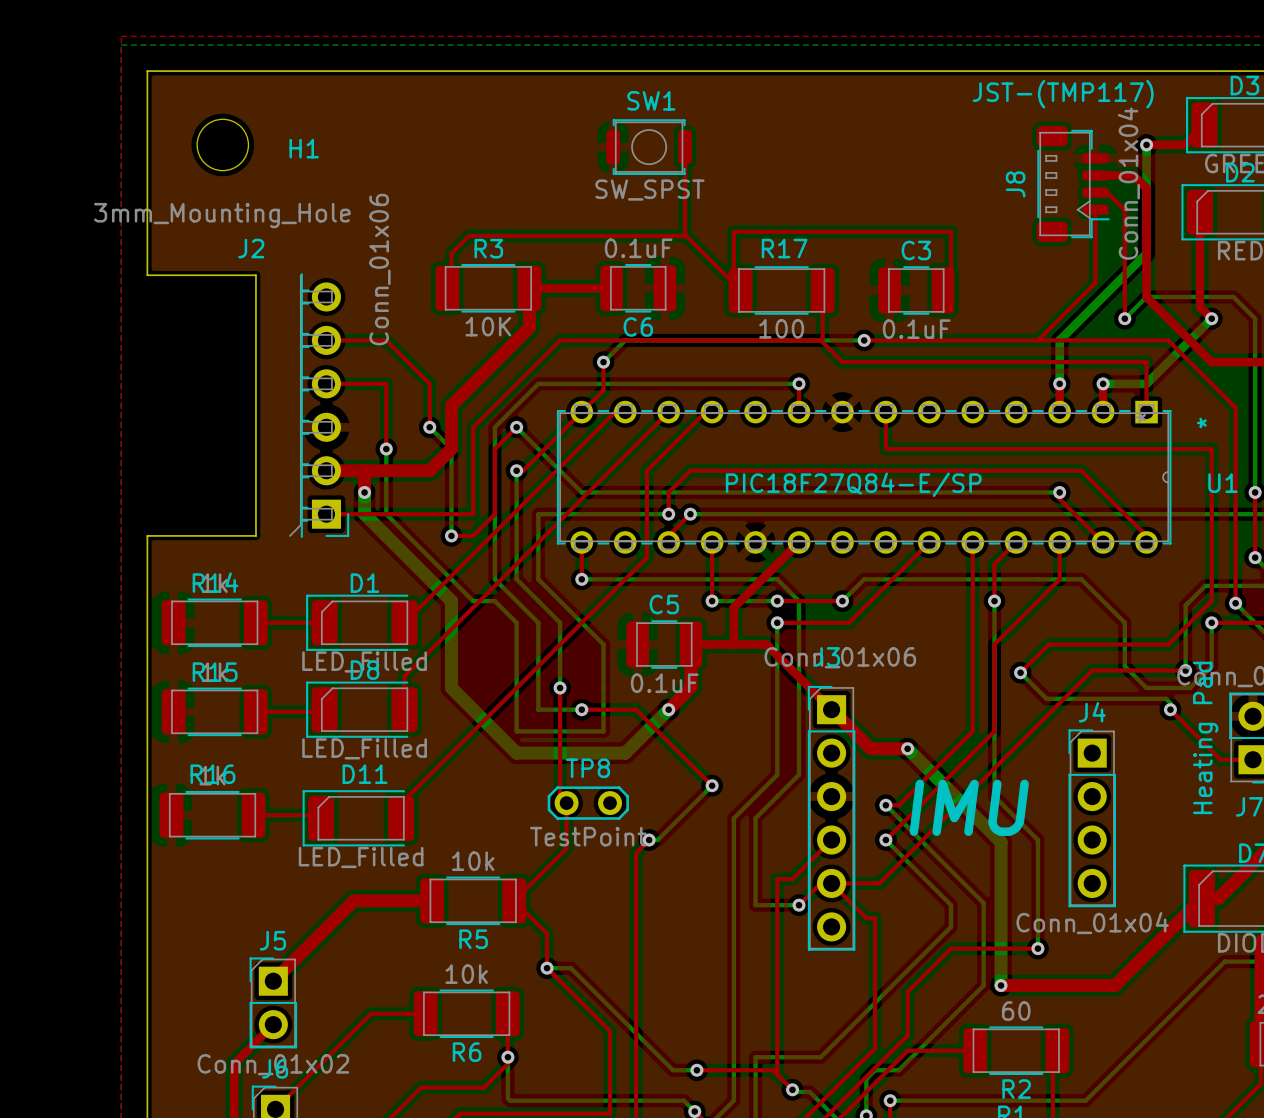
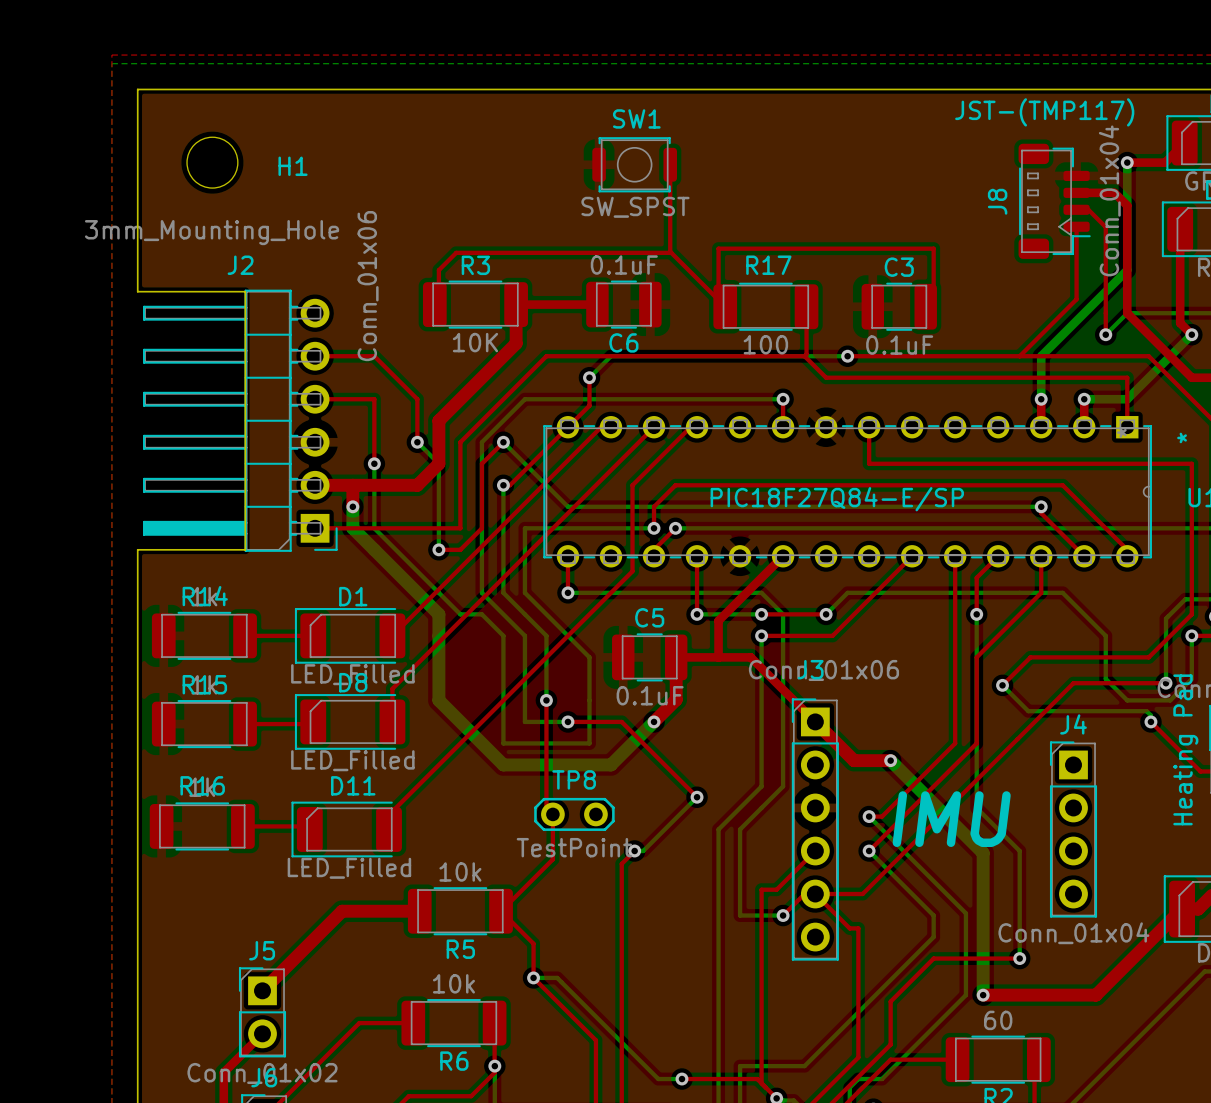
J2 footprint: [289, 273, 350, 538] -> [143, 289, 338, 552]

